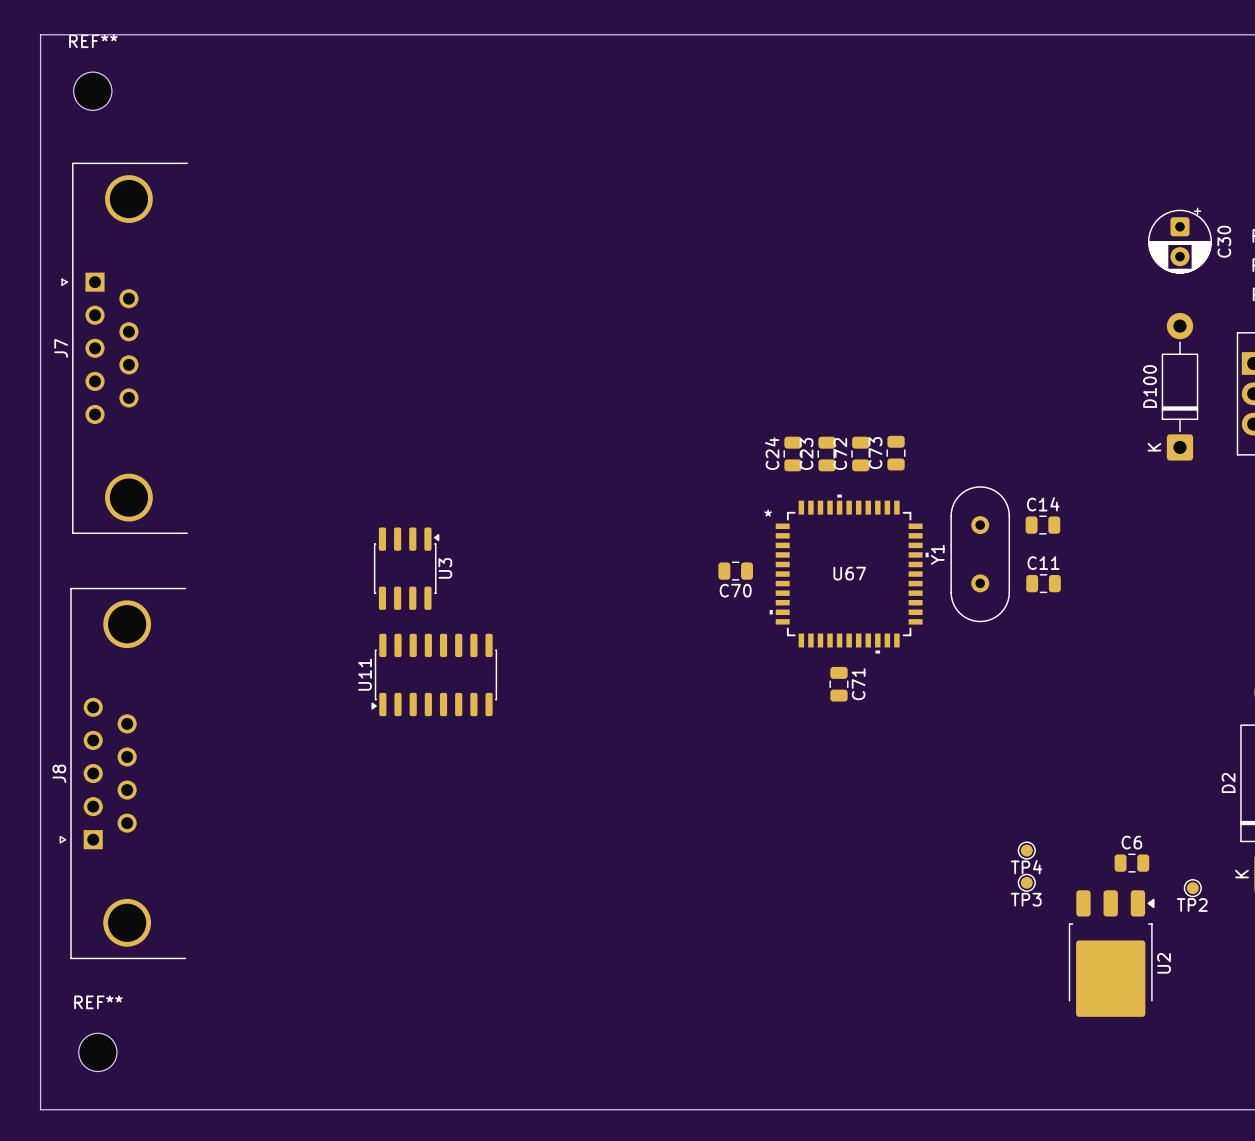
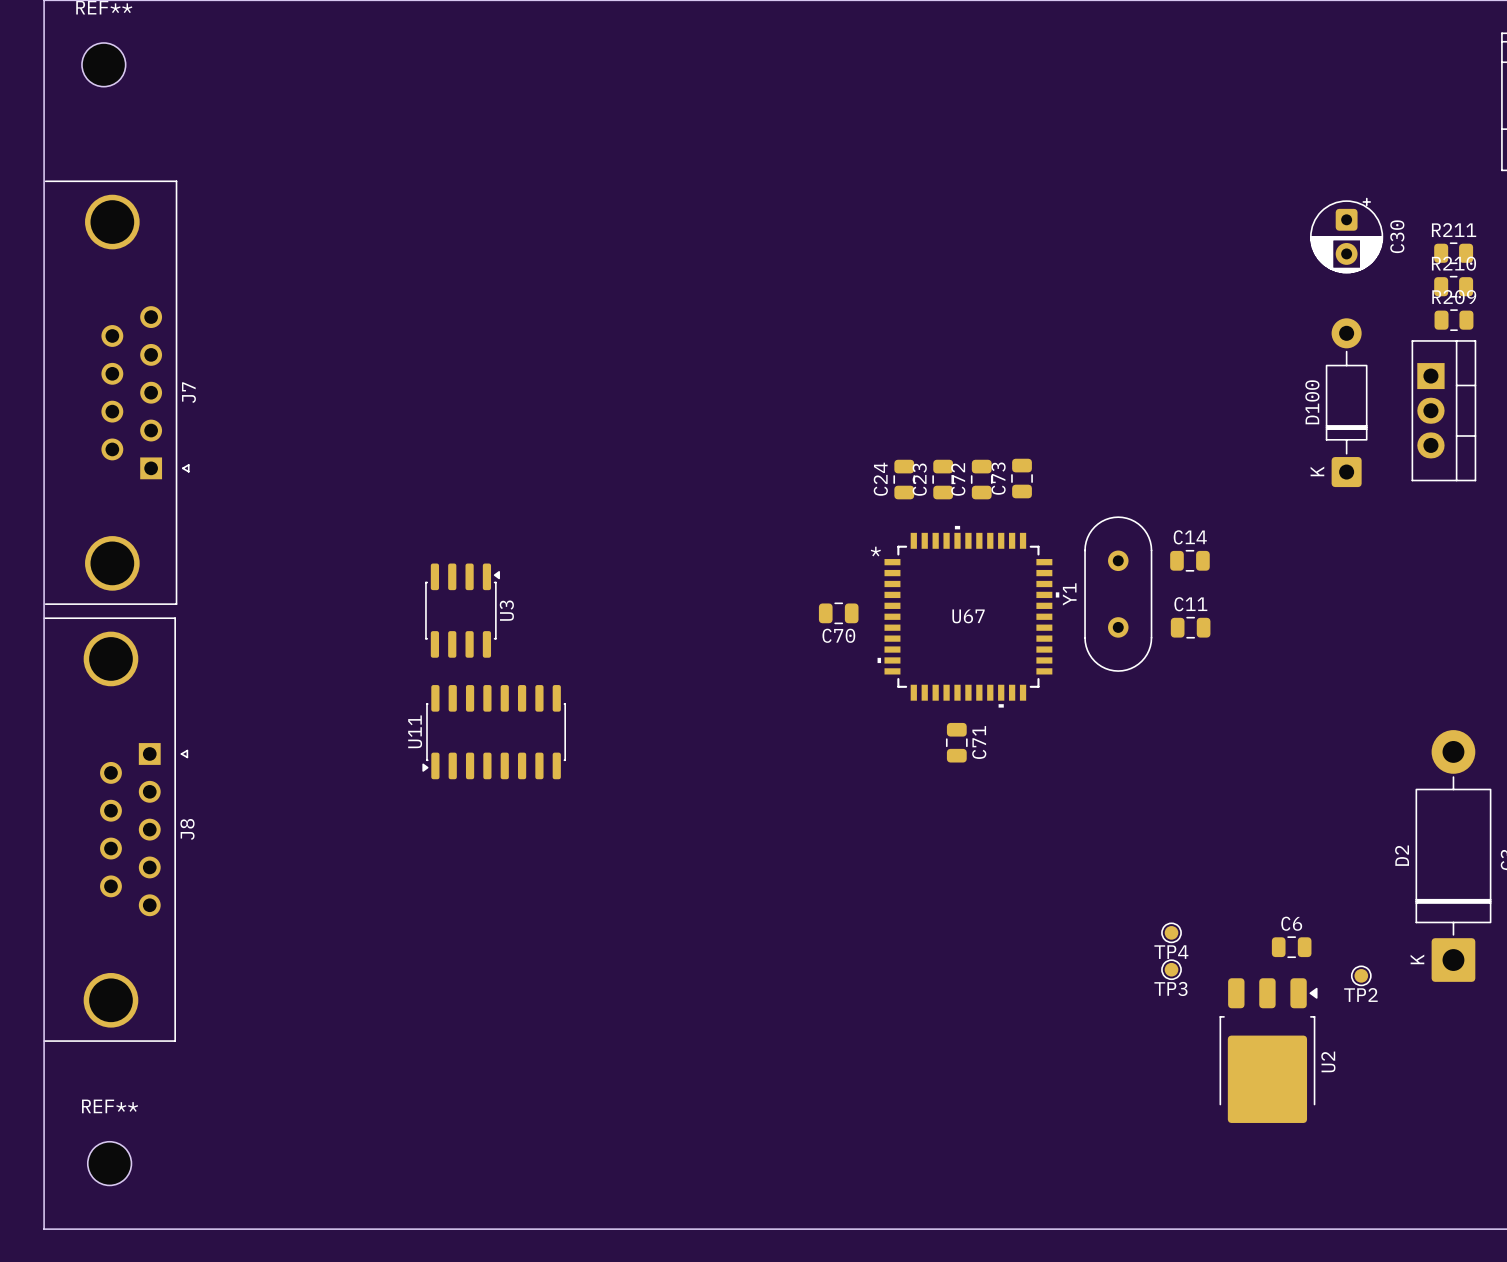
J7 rotation: 0° (124, 348) -> 180° (117, 392)
J8 rotation: 0° (122, 773) -> 180° (115, 829)

